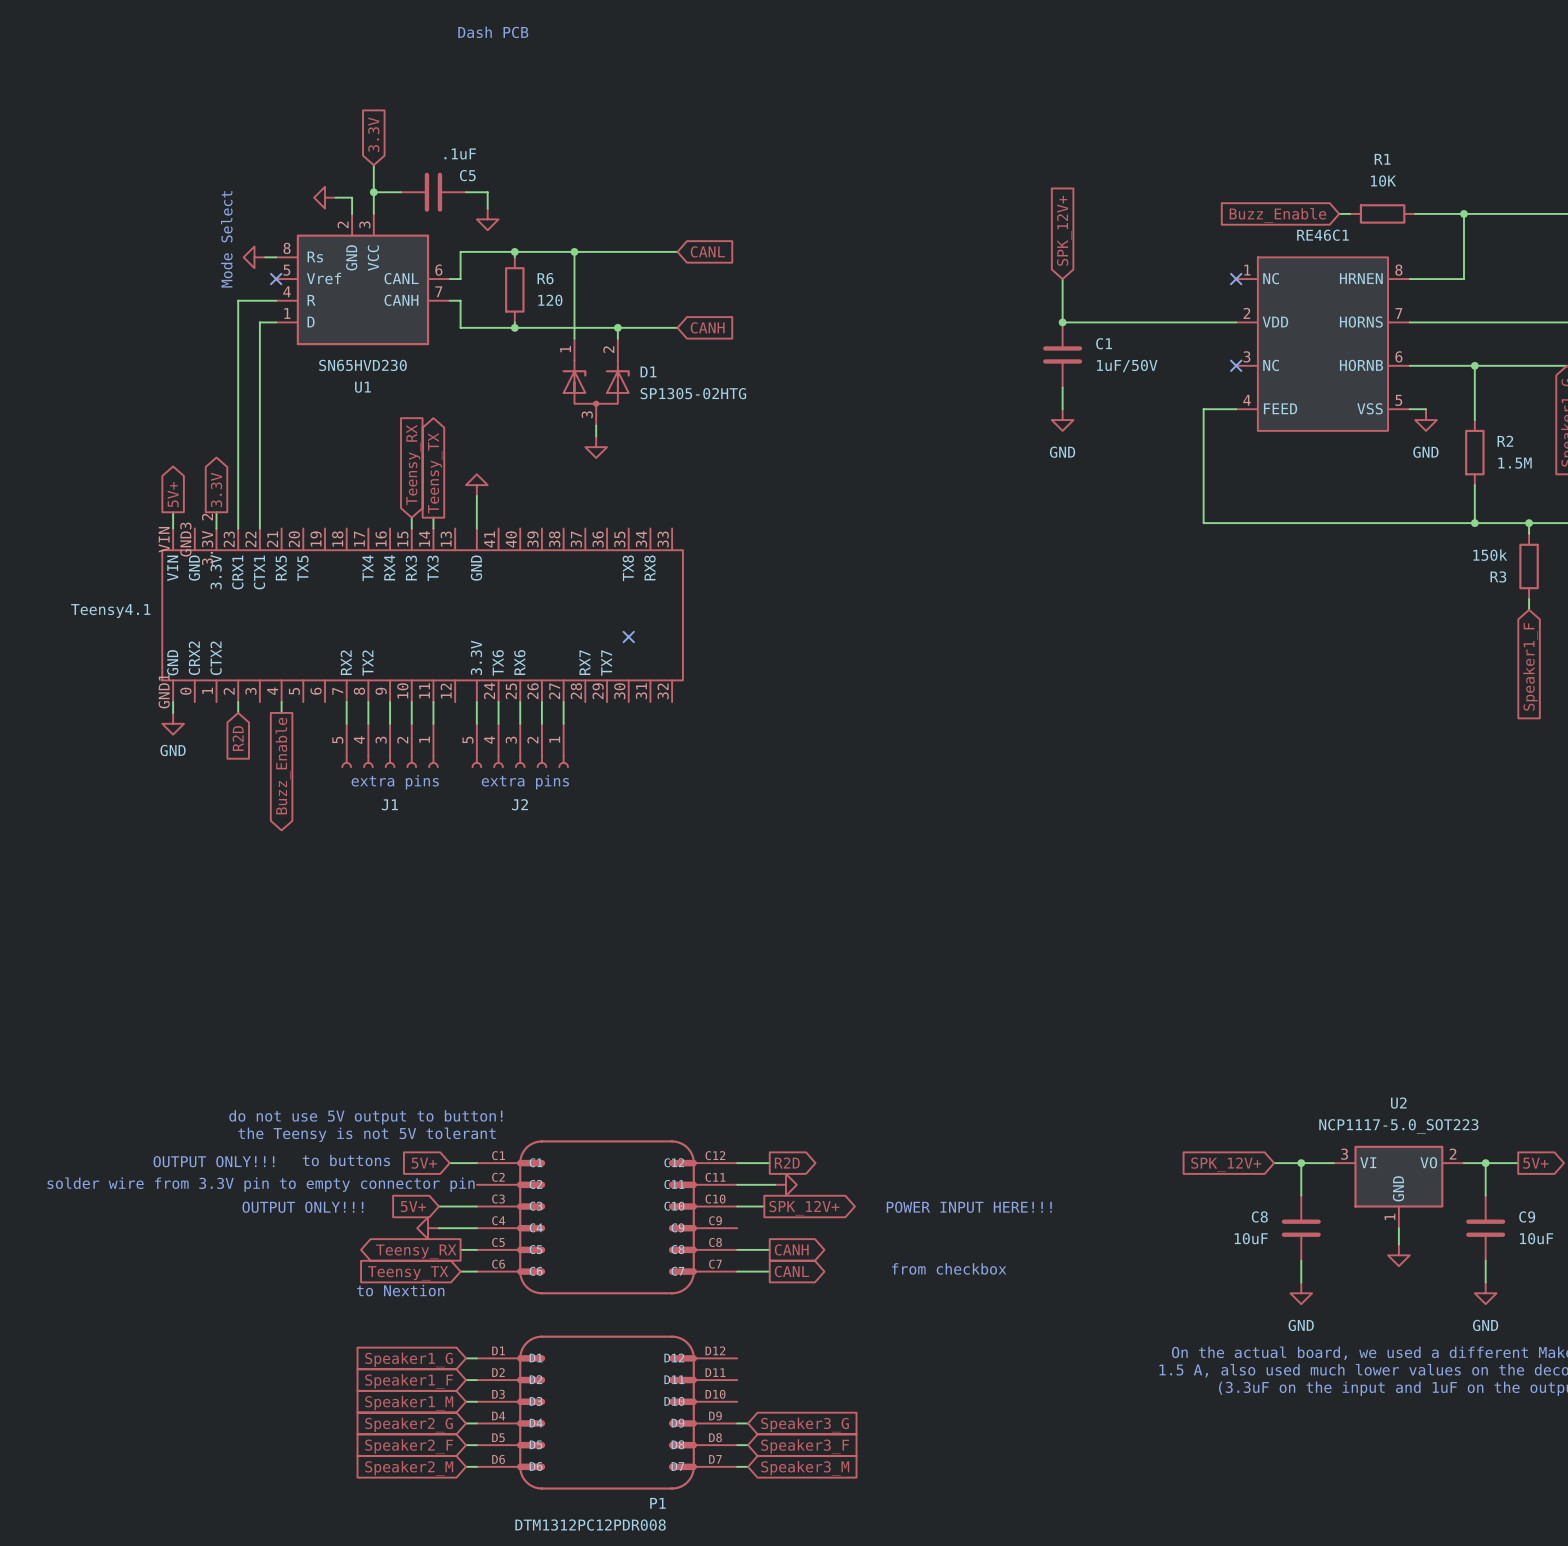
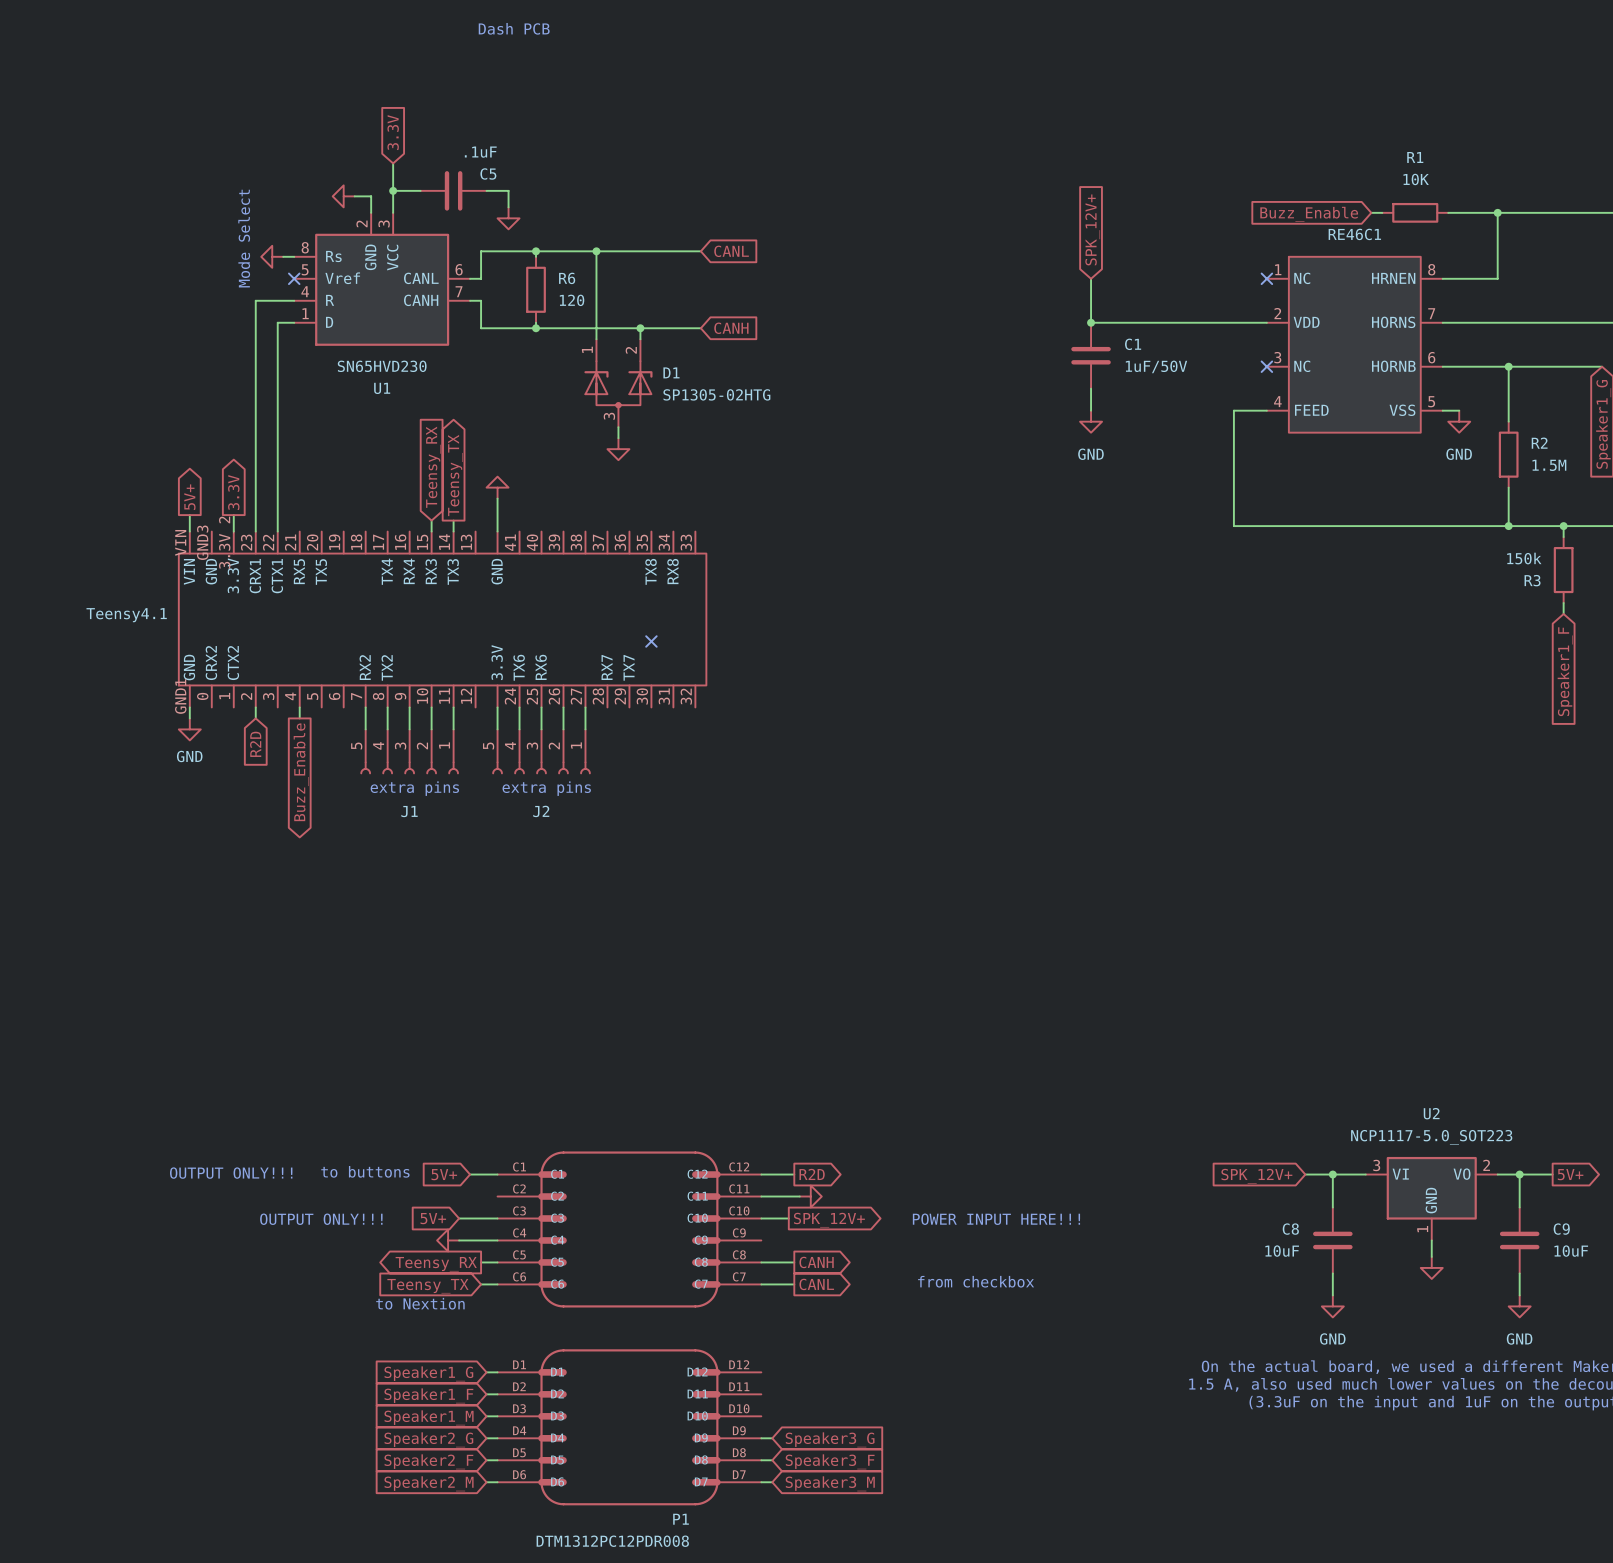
text: do not use 5V output to button! (365, 1117) -> none
text: the Teensy is not 5V tolerant (367, 1134) -> none
text: solder wire from 3.3V pin to empty connector pin (261, 1184) -> none

